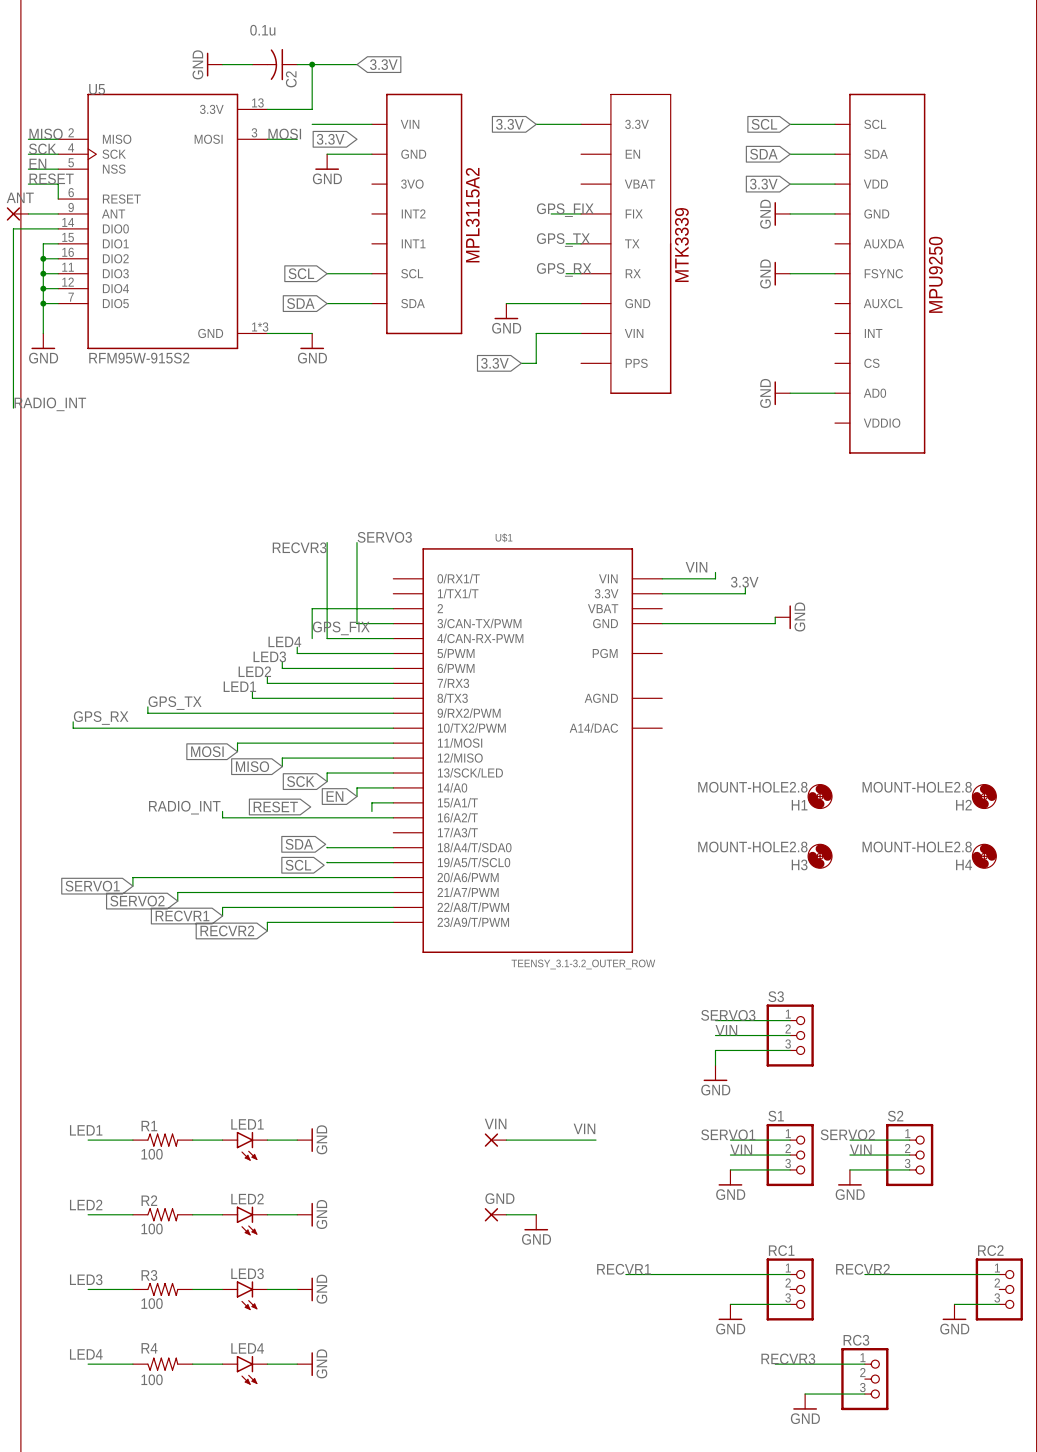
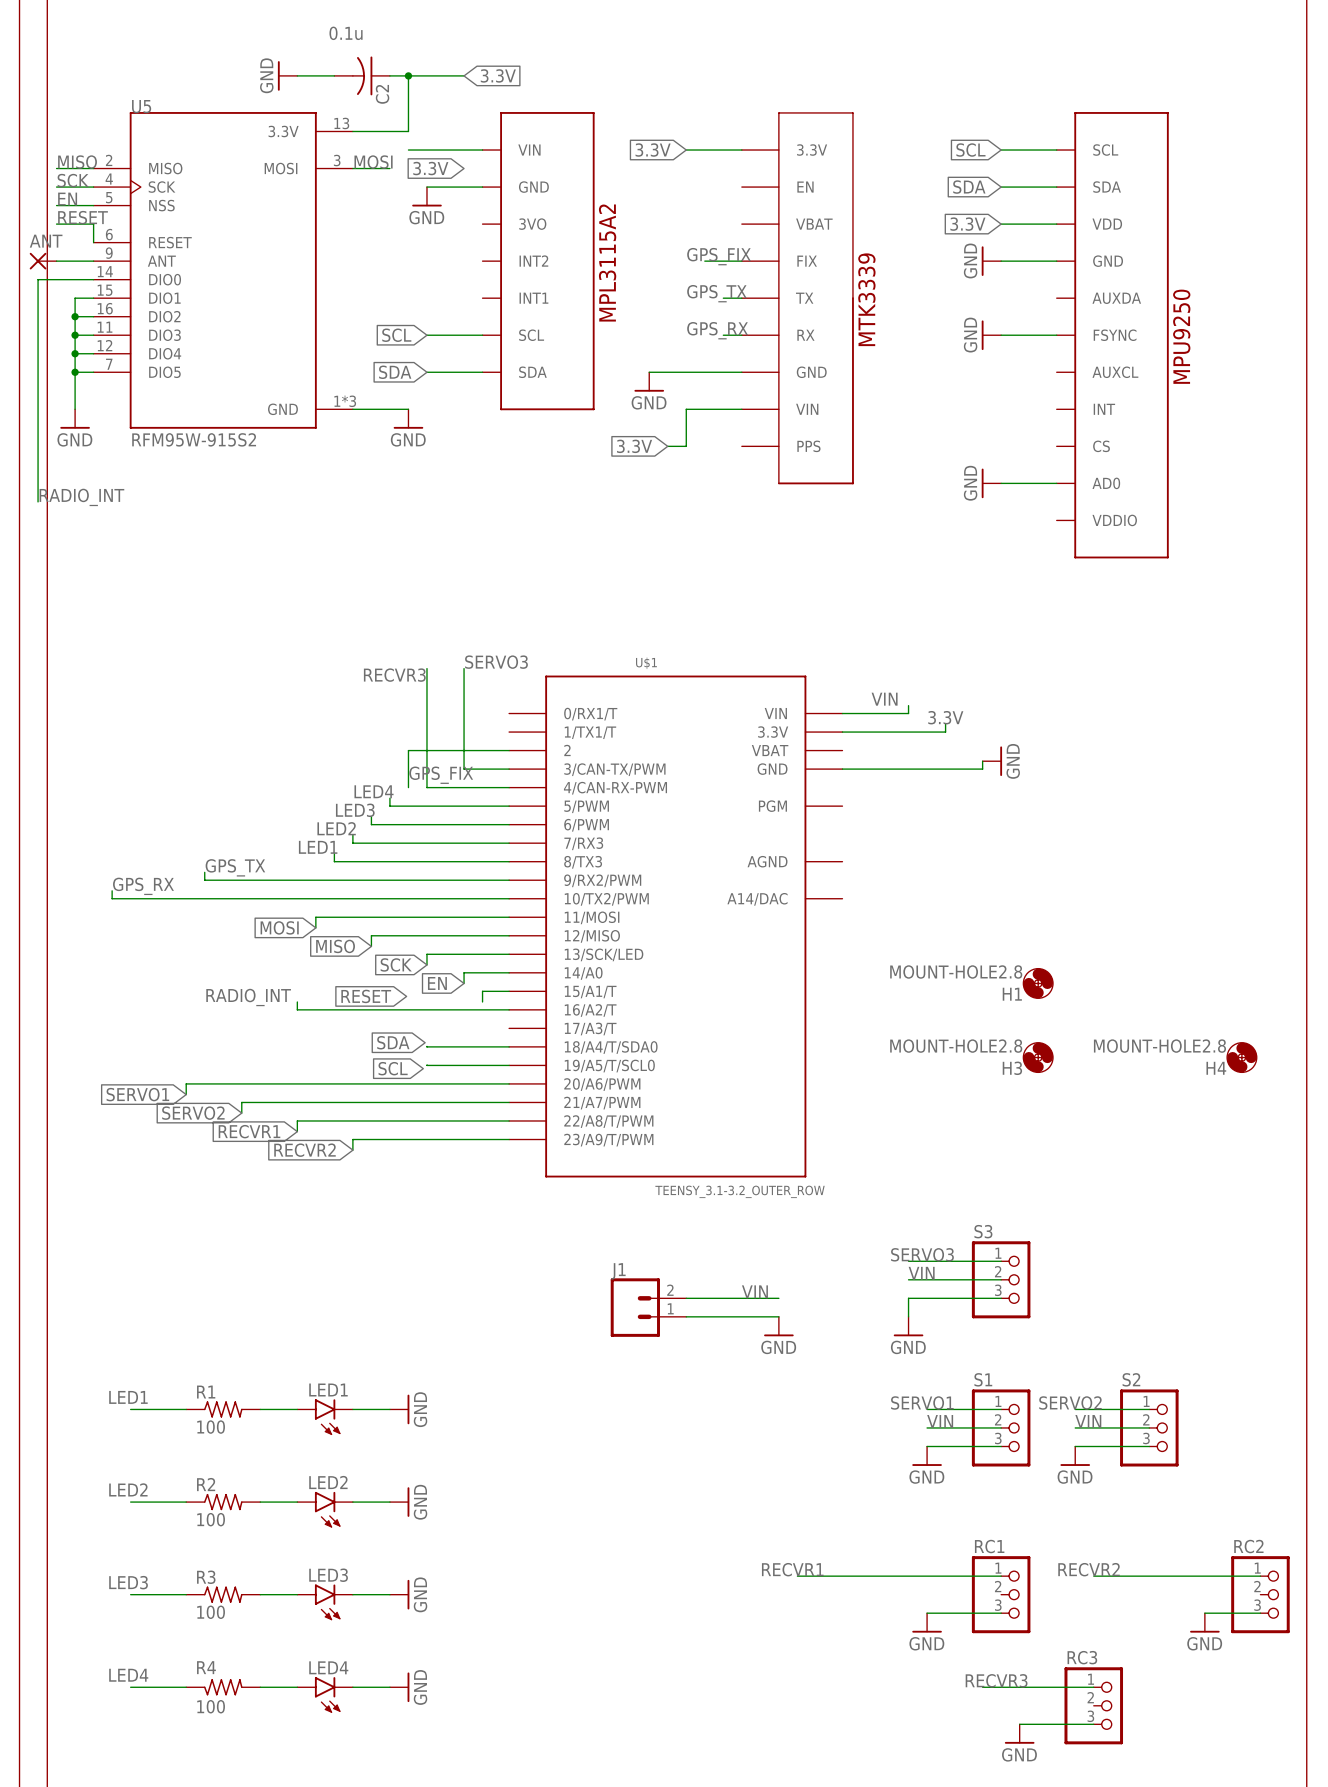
H2: MOUNT-HOLE2.8 (984, 796) -> none
wire: none -> (686, 1298) (778, 1298)
J1: none -> (648, 1307)
wire: none -> (686, 1316) (778, 1316)
power symbol: none -> GND (778, 1326)
label position: VIN (584, 1128) -> VIN (754, 1291)
VIN: (495, 1140) -> none
wire: (506, 1140) (595, 1140) -> none
GND: (495, 1214) -> none
wire: (506, 1214) (536, 1214) -> none
power symbol: GND (536, 1222) -> none

